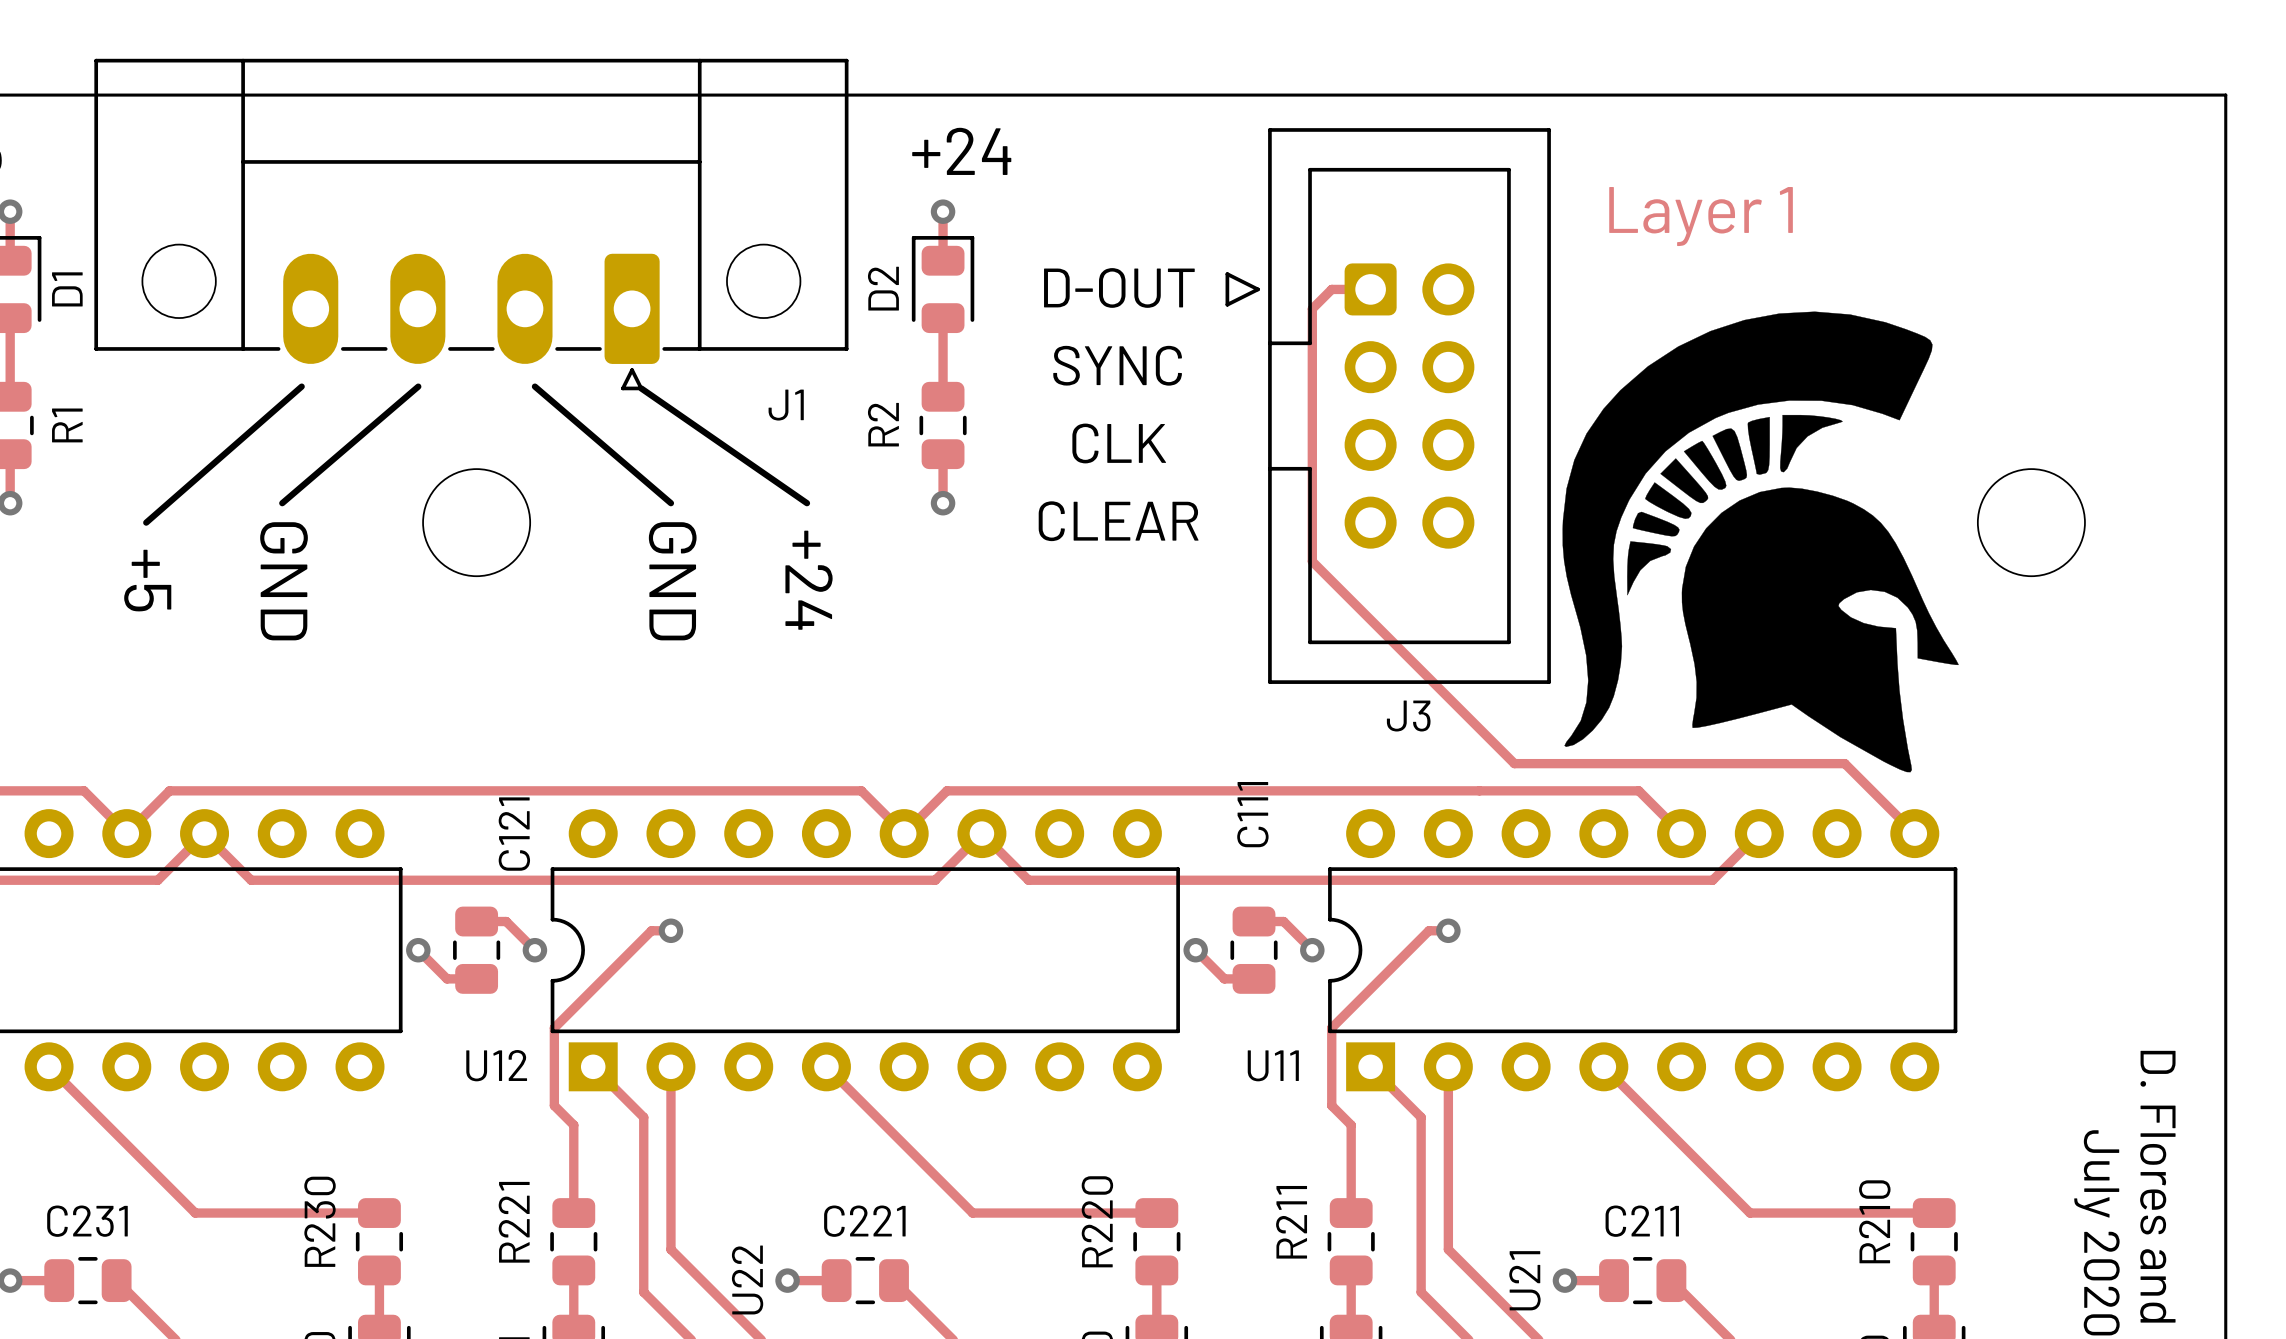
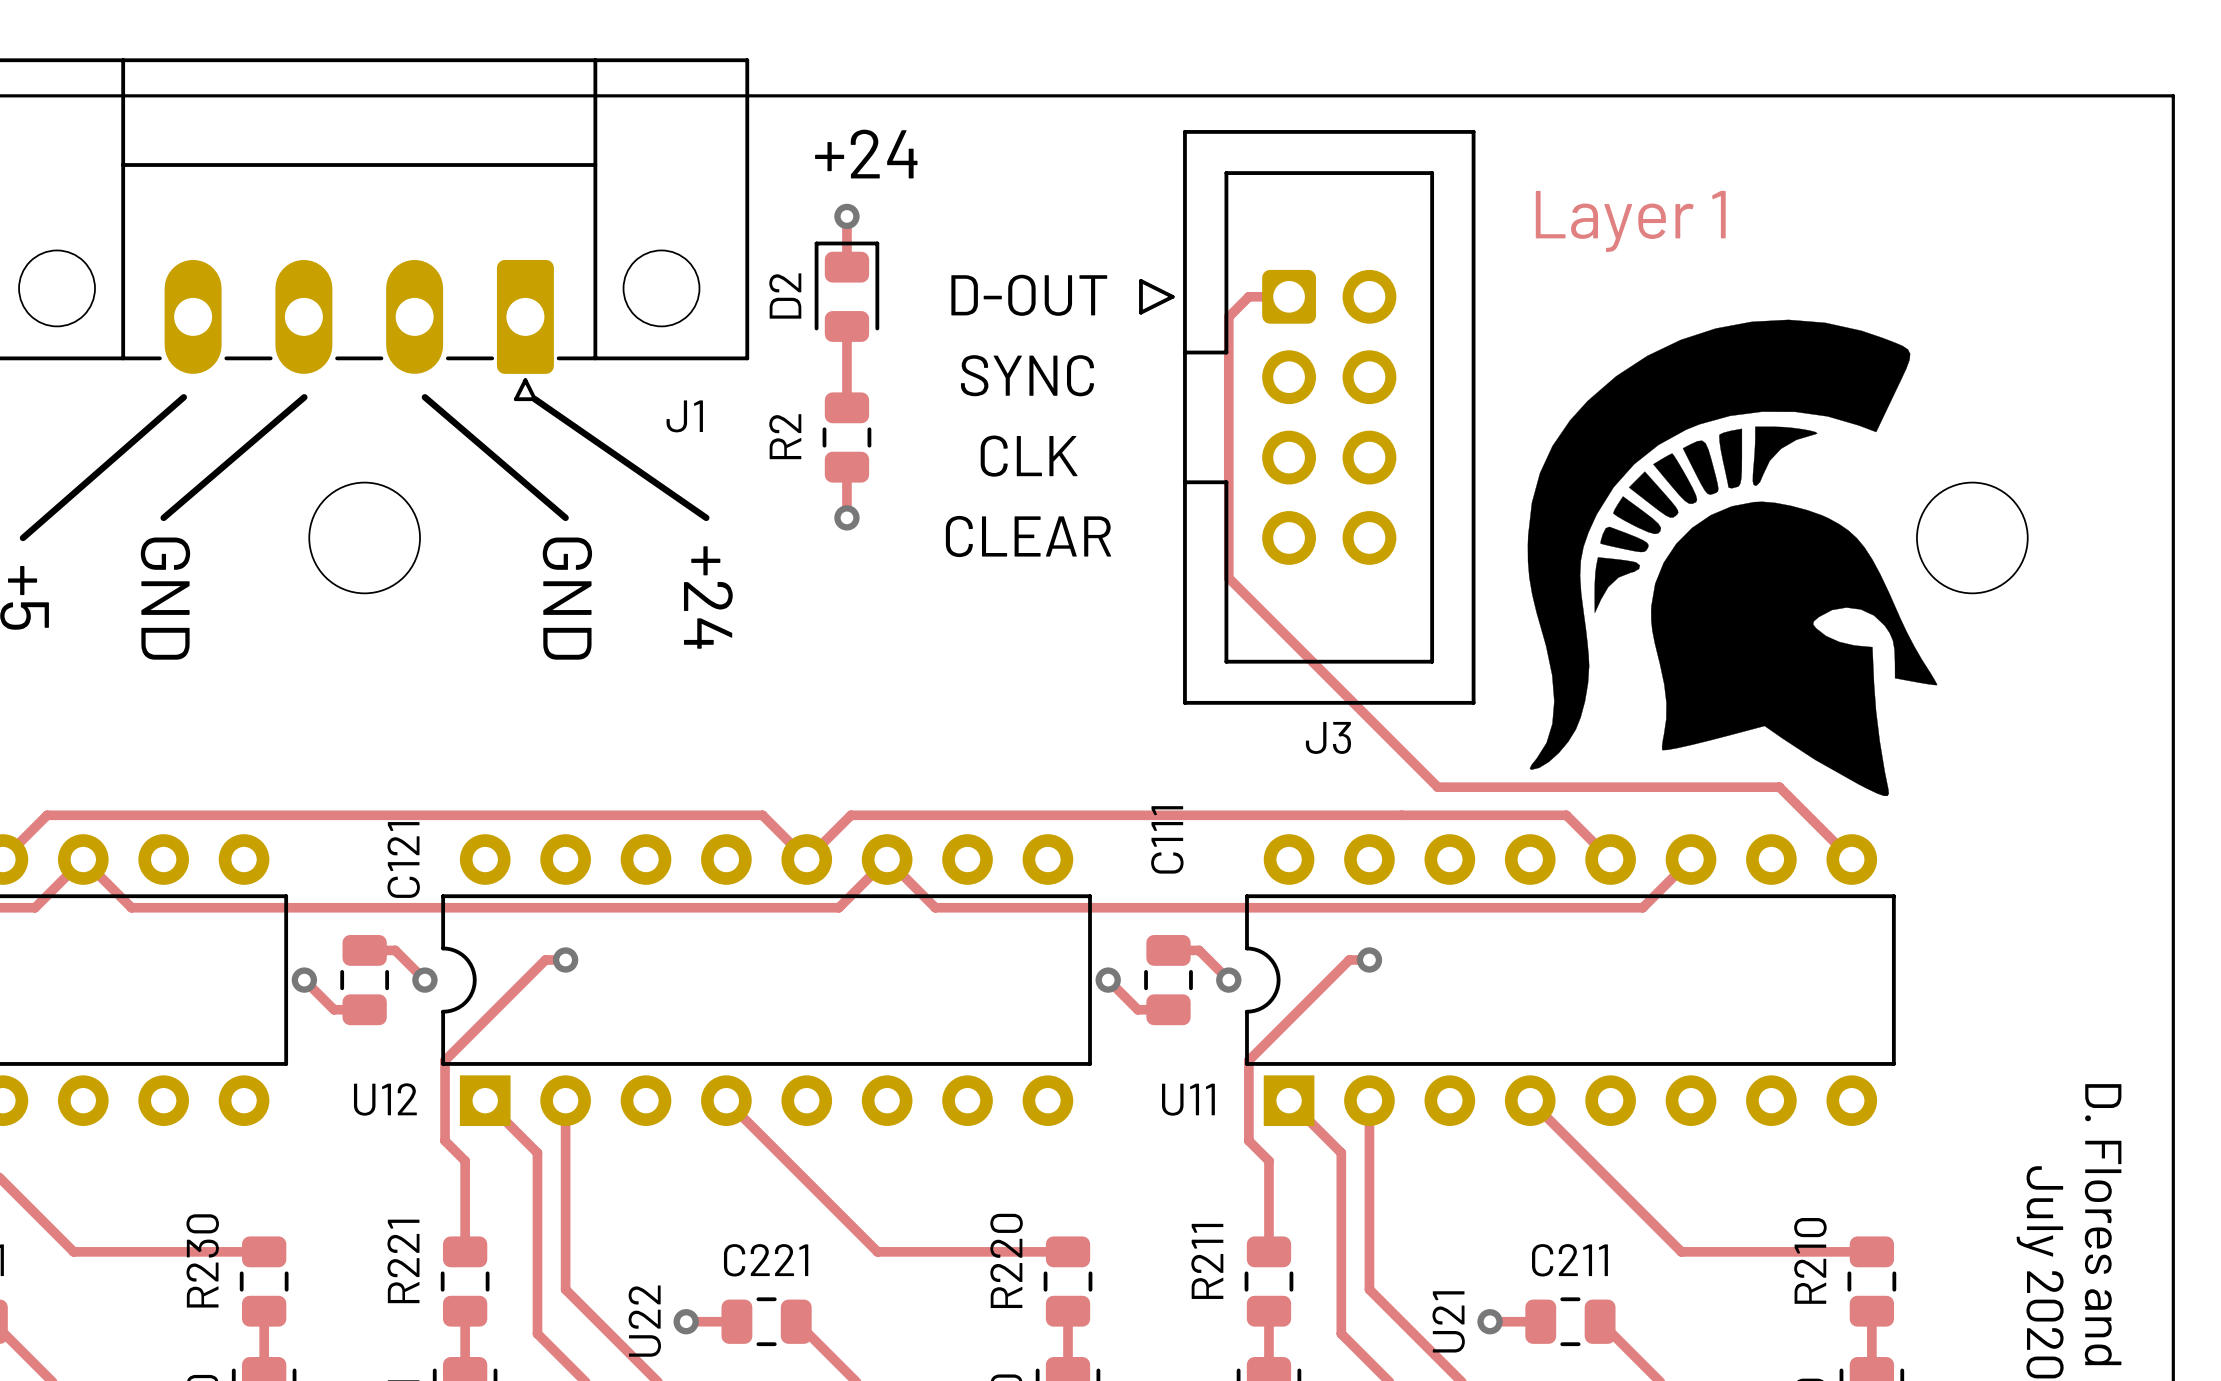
drawing position: (1760, 541) -> (1732, 557)

